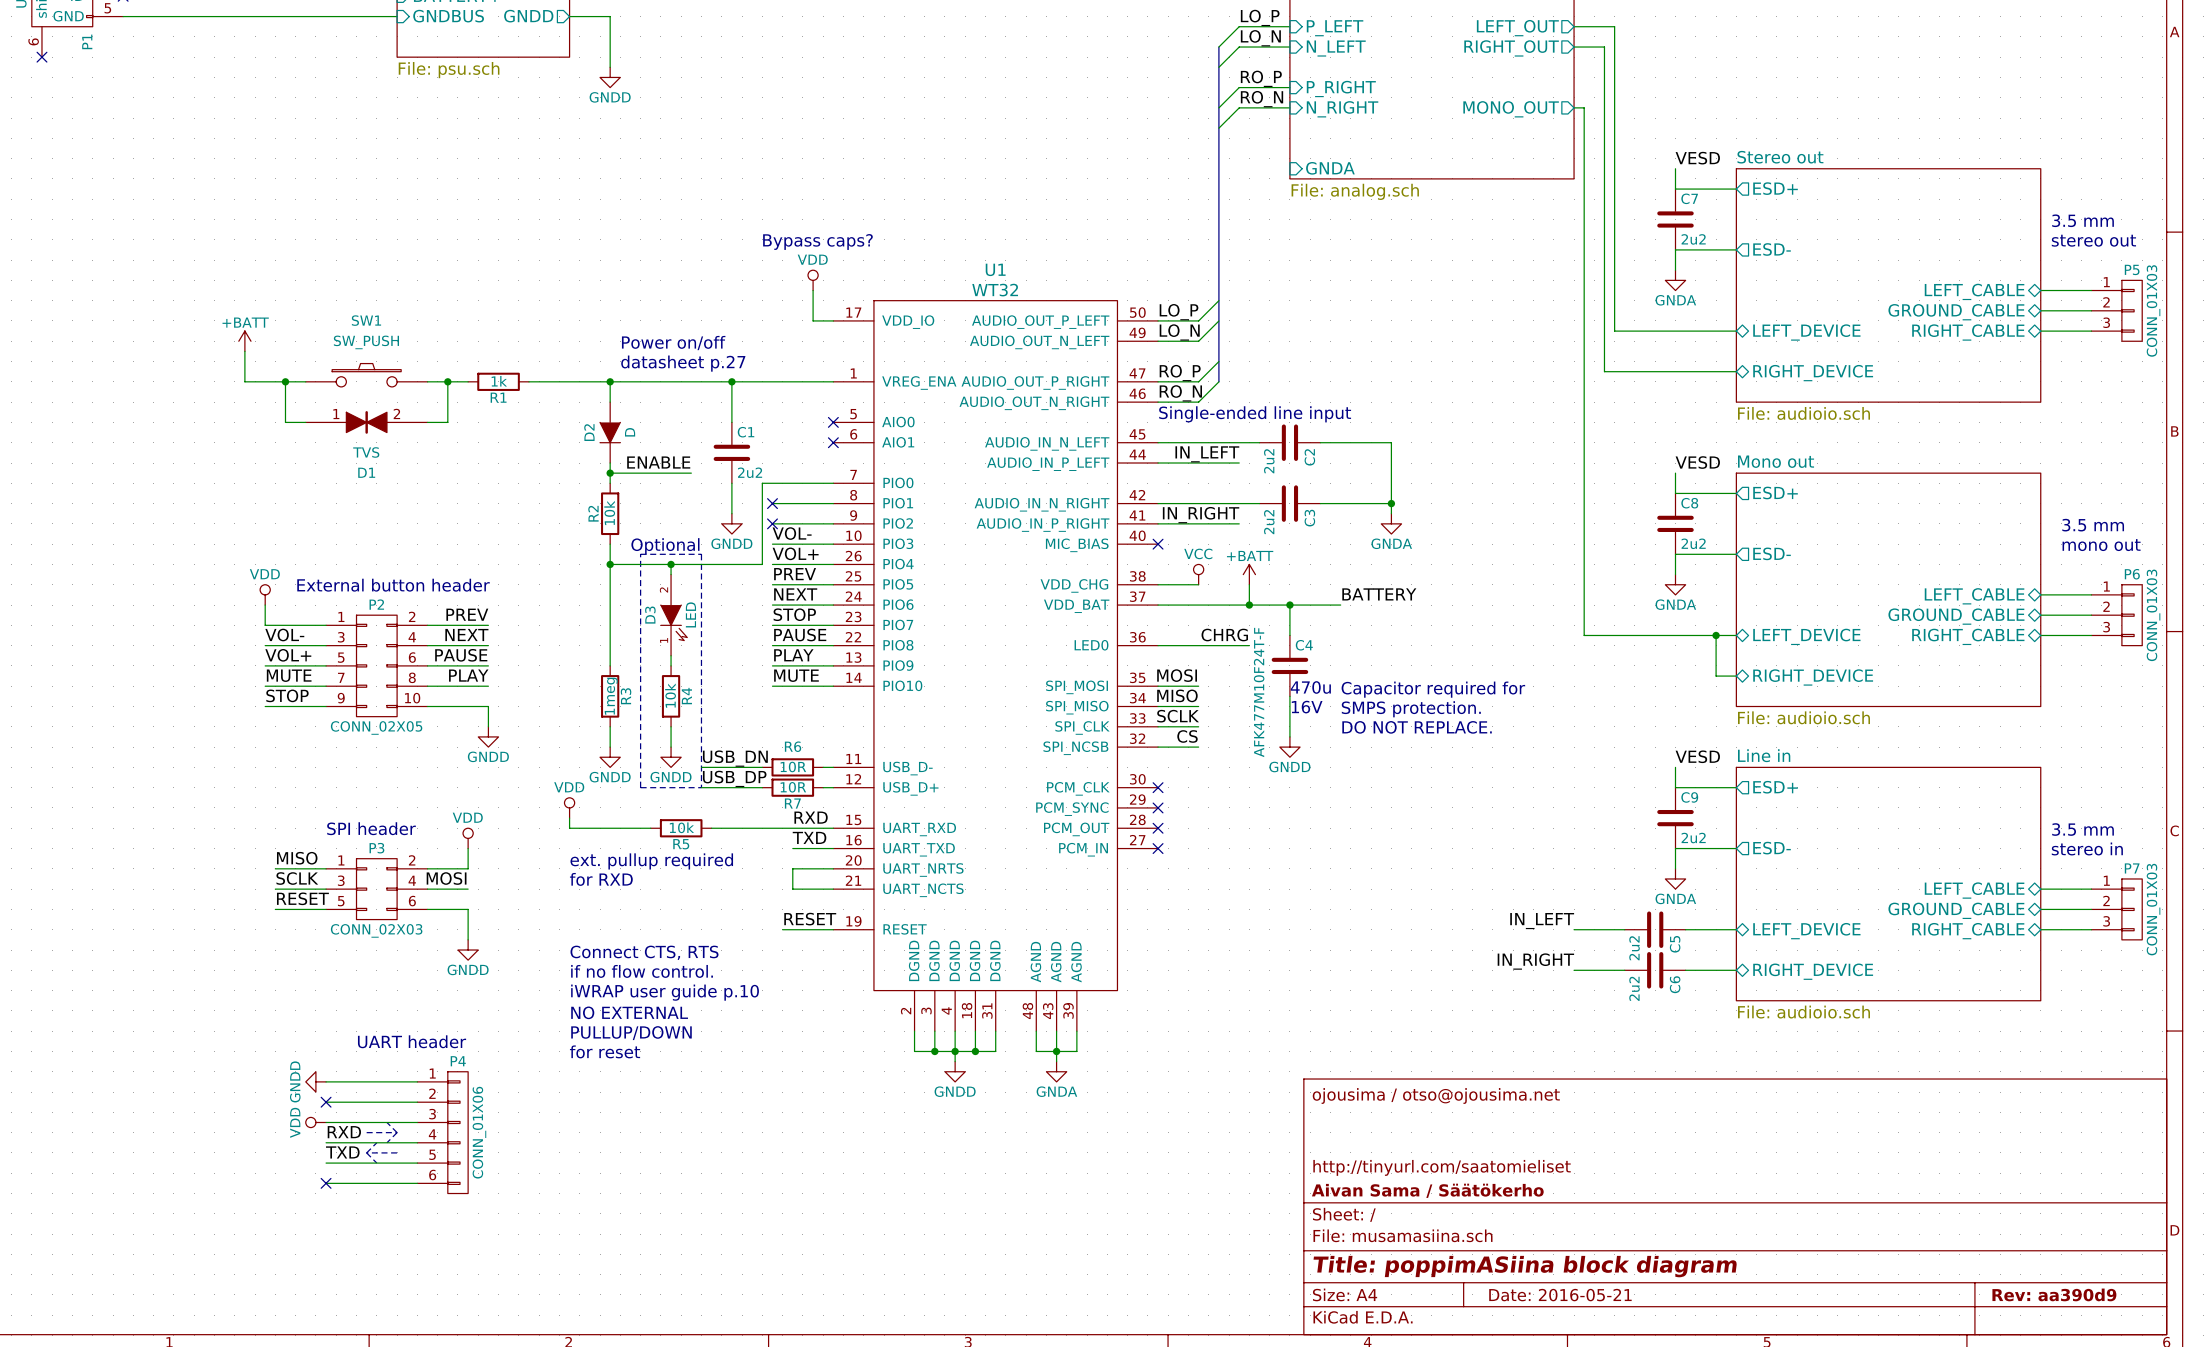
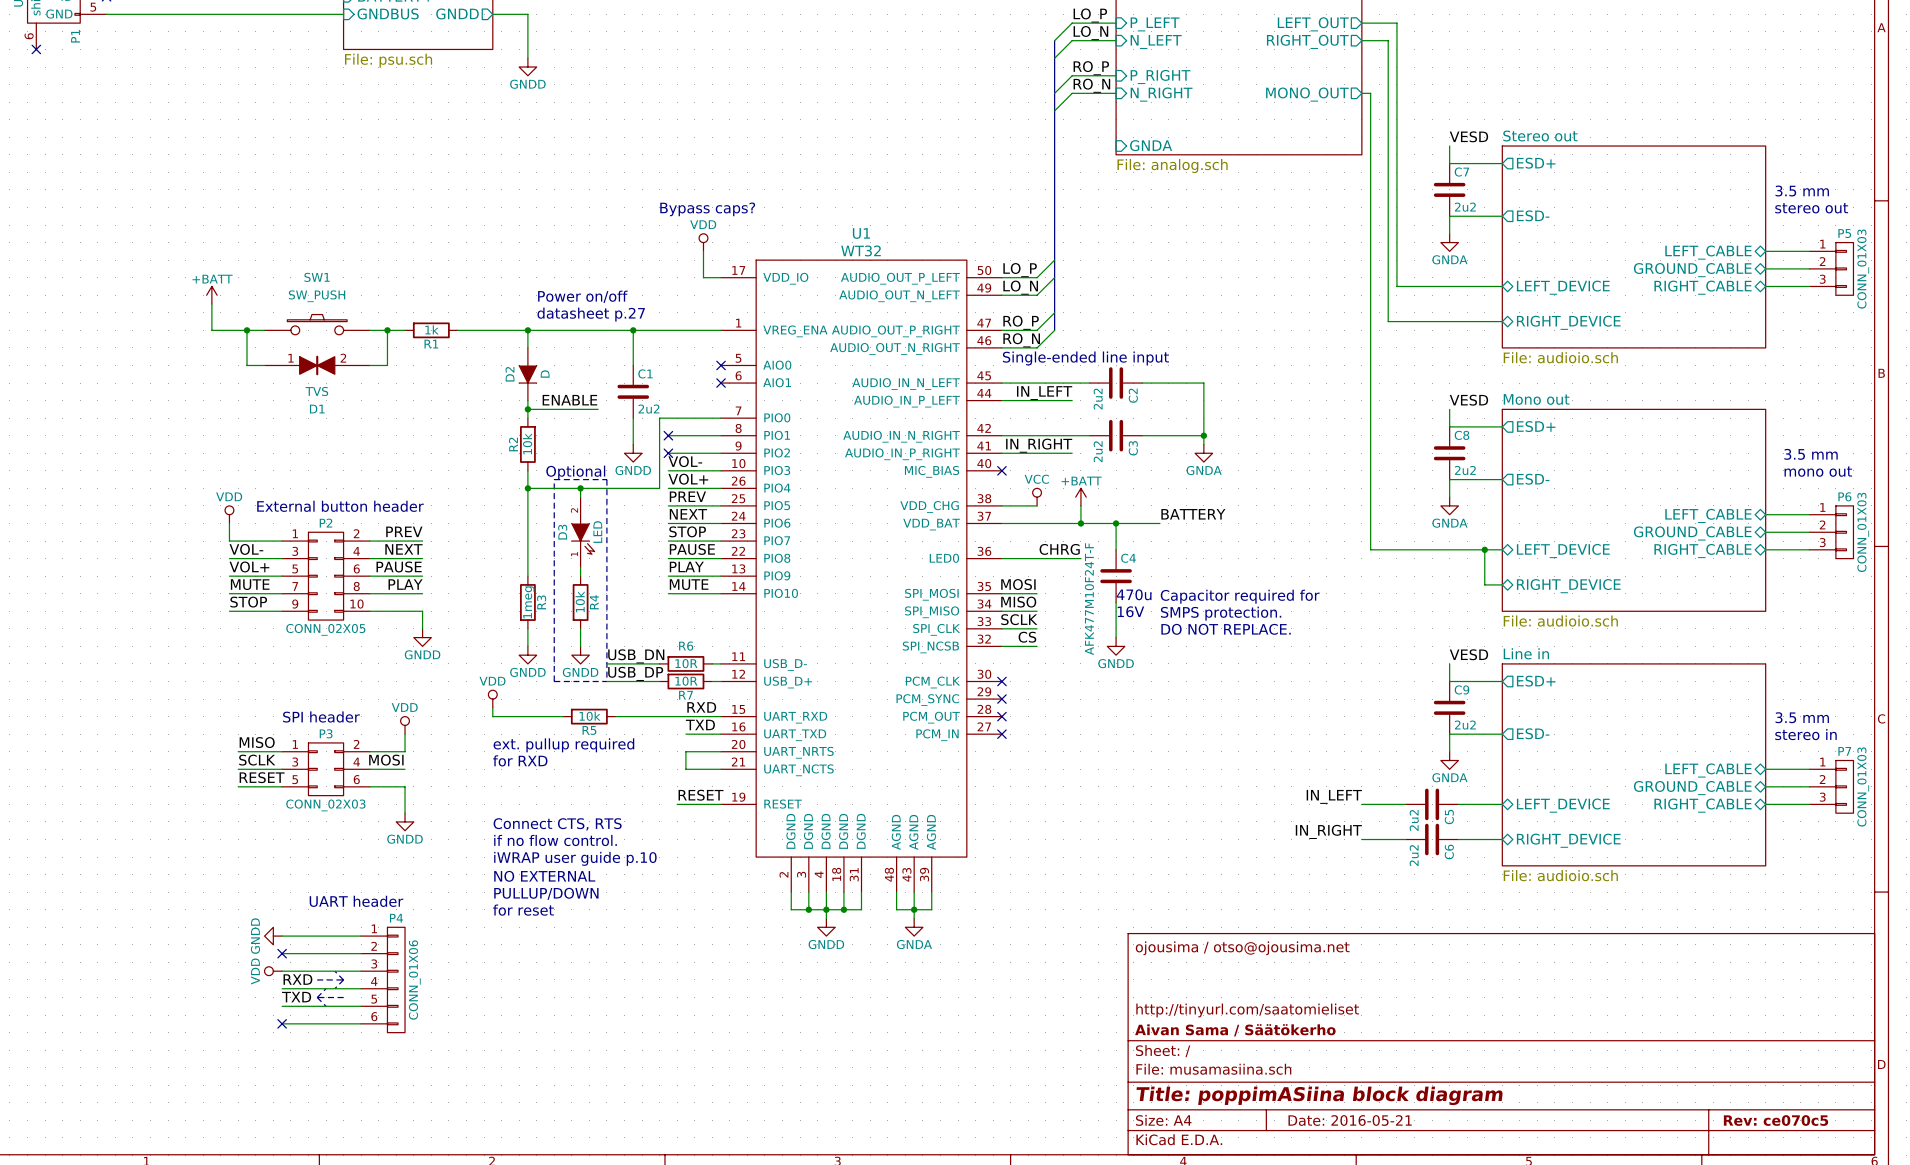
title block: Rev: aa390d9 (2054, 1294) -> Rev: ce070c5 (1776, 1120)

